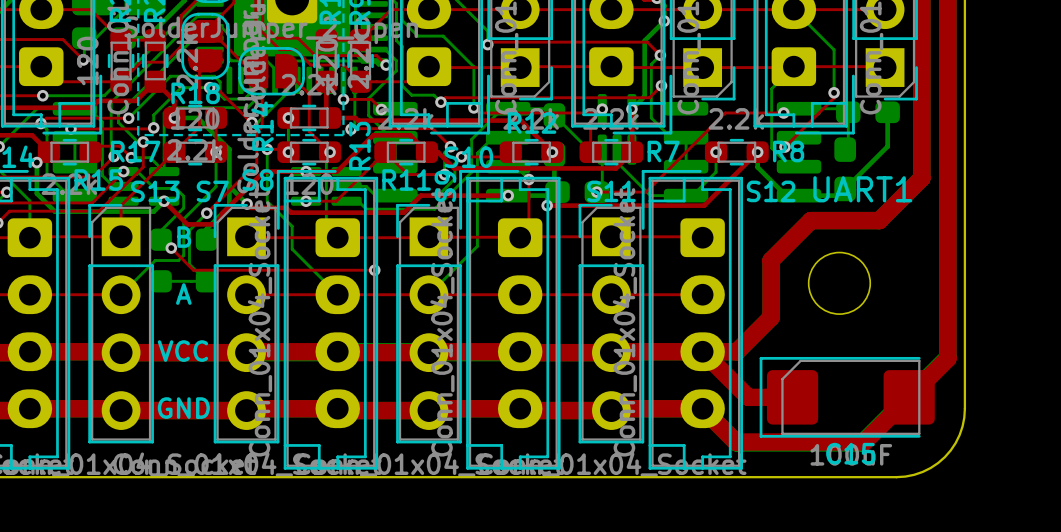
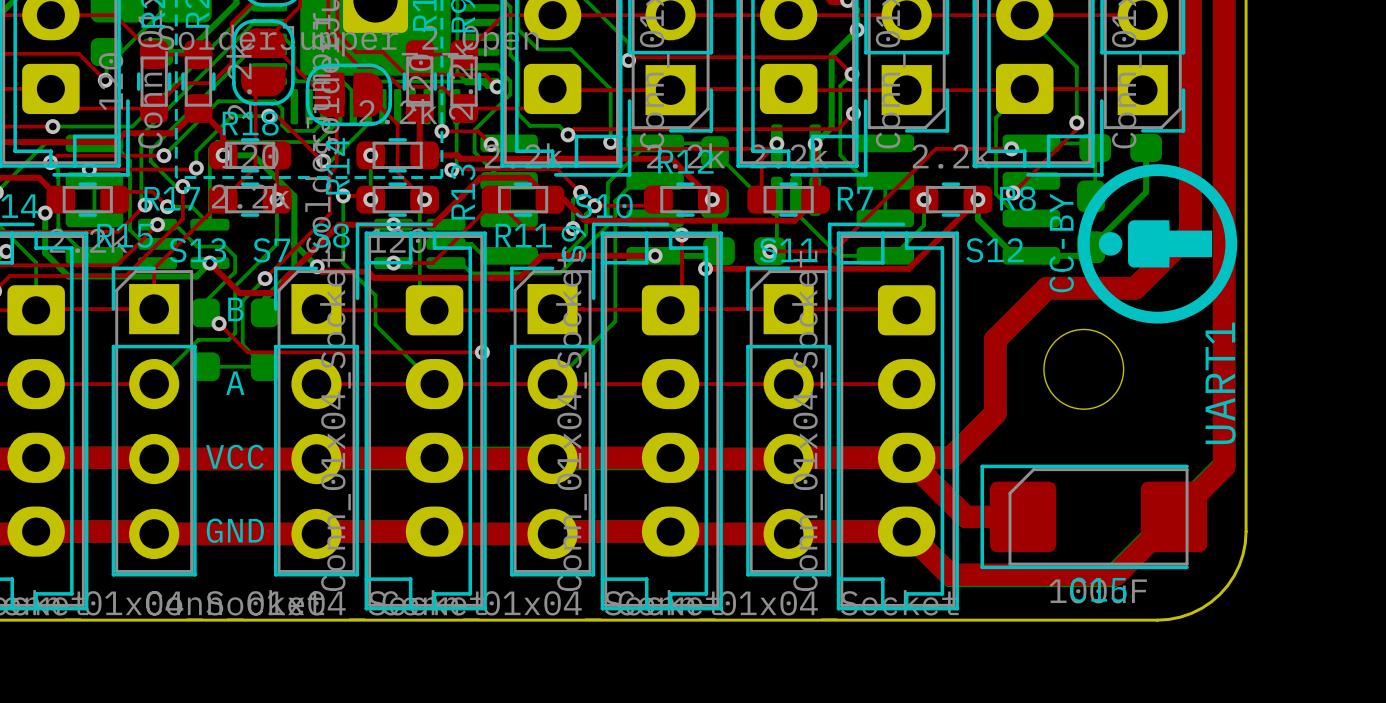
drawing: none -> [1077, 164, 1238, 324]
text: none -> CC-BY (1061, 242)
text rotation: 0° (862, 189) -> 90° counterclockwise (1220, 383)
text position: UART1 (862, 189) -> UART1 (1220, 383)

